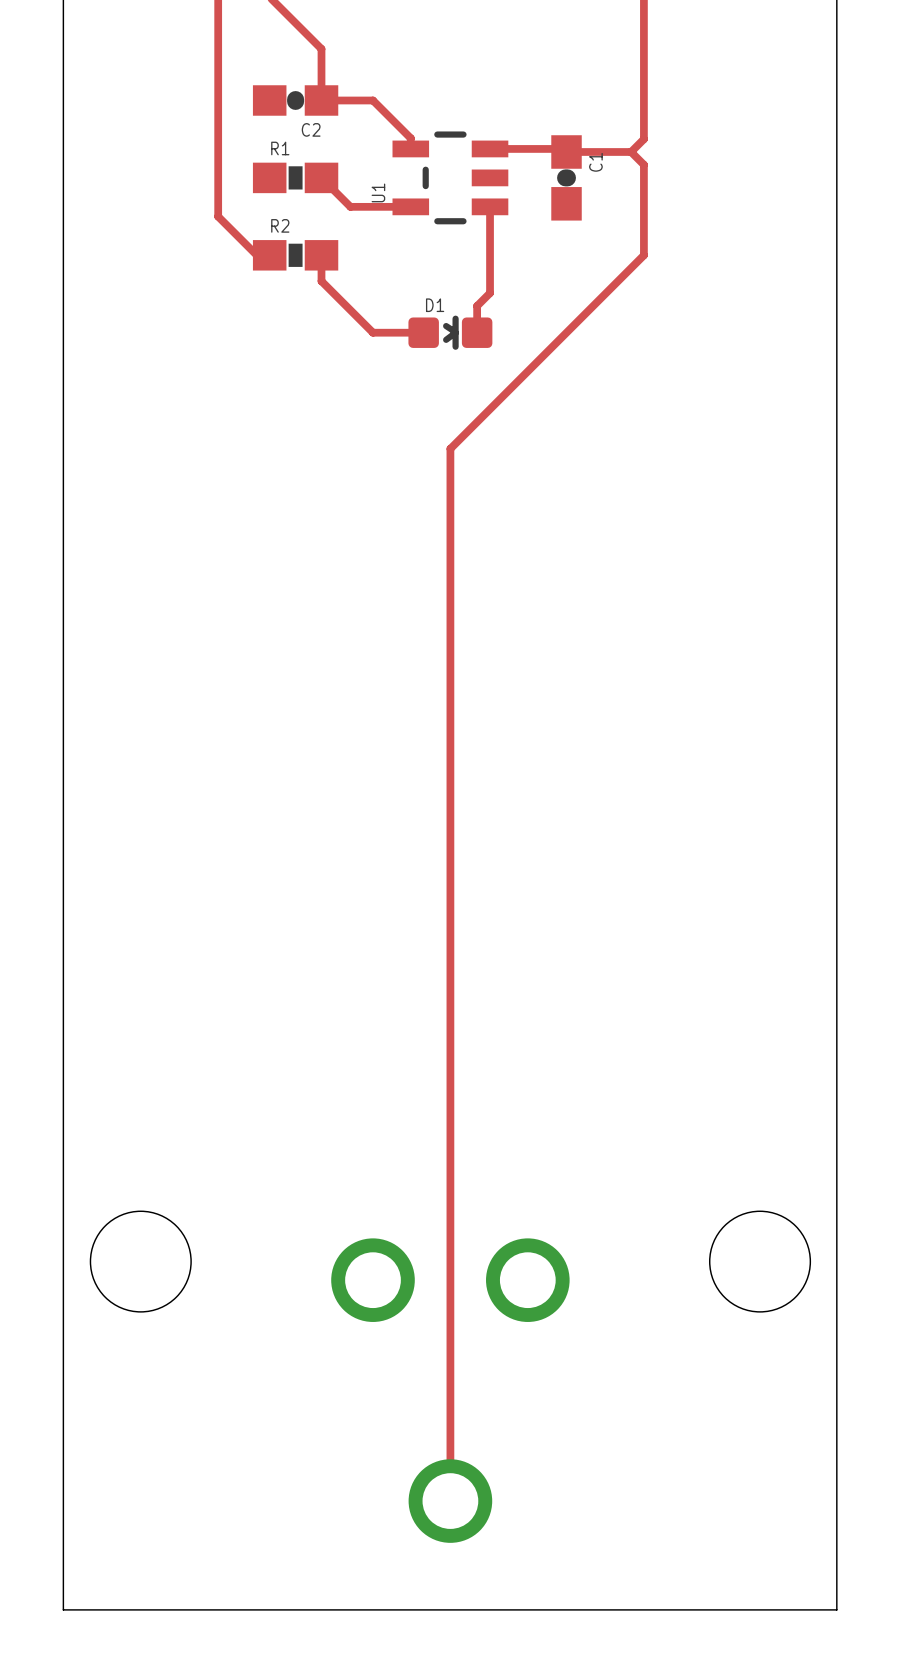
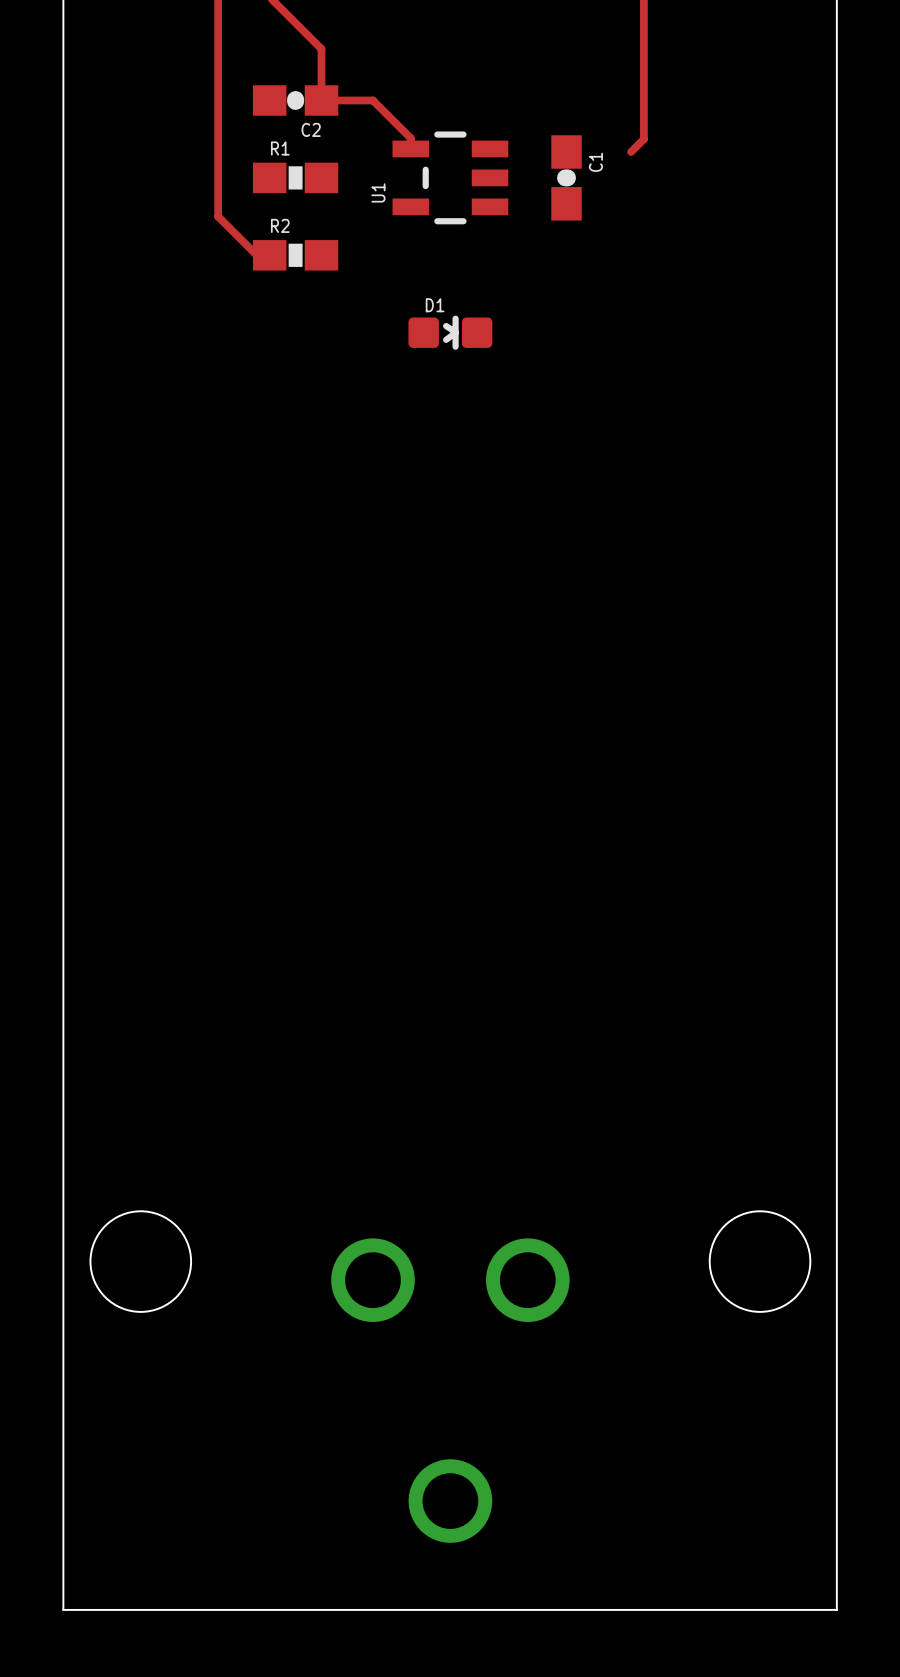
track: (490, 148) (563, 148) (566, 151) (631, 151) (643, 164) (643, 255) (450, 448) (450, 1501) -> none
track: (321, 177) (350, 206) (410, 206) -> none
track: (490, 206) (490, 293) (477, 305) (477, 332) -> none
track: (321, 255) (321, 281) (373, 332) (423, 332) -> none

